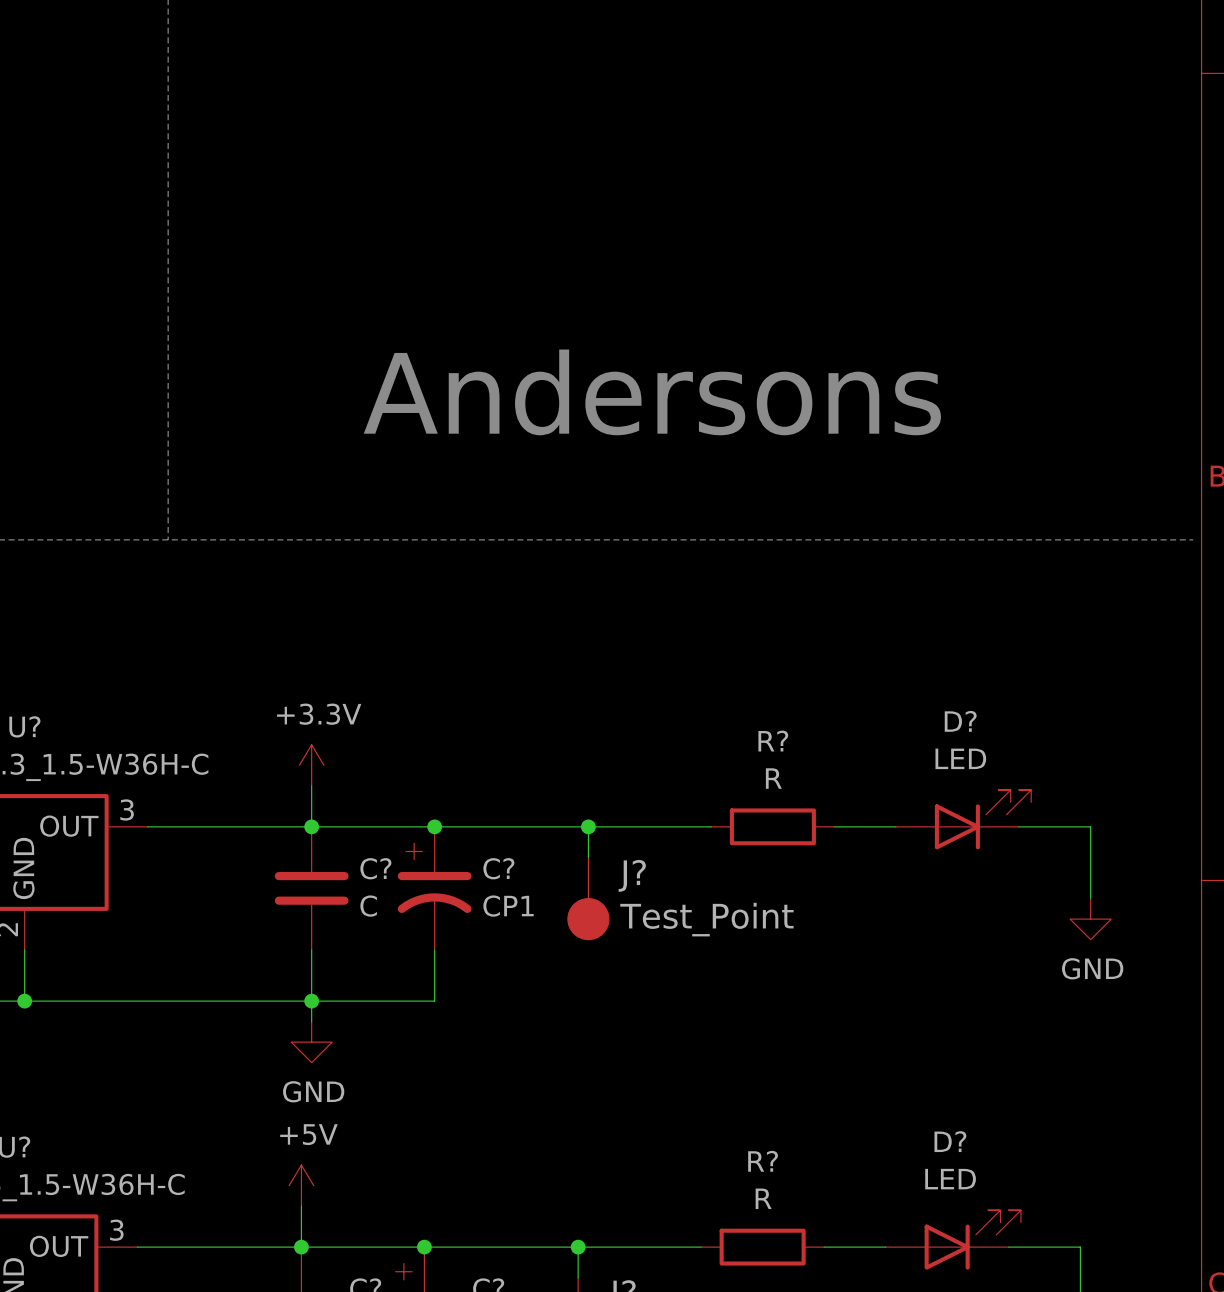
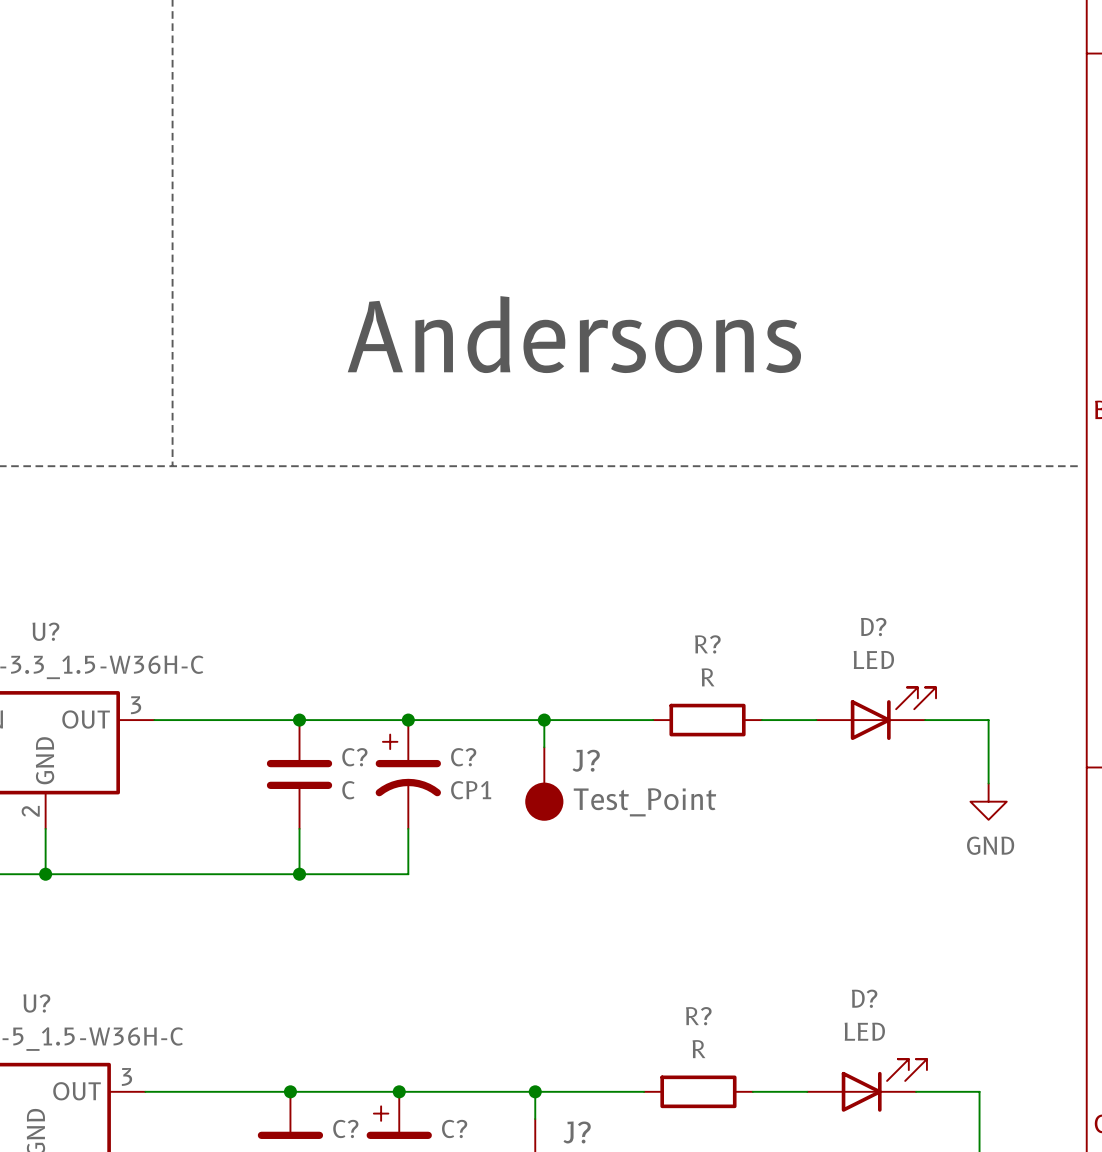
power symbol: +3.3V (311, 765) -> none
wire: (311, 785) (311, 826) -> none
wire: (311, 1001) (311, 1021) -> none
power symbol: GND (311, 1042) -> none
power symbol: +5V (301, 1185) -> none
wire: (301, 1206) (301, 1247) -> none

